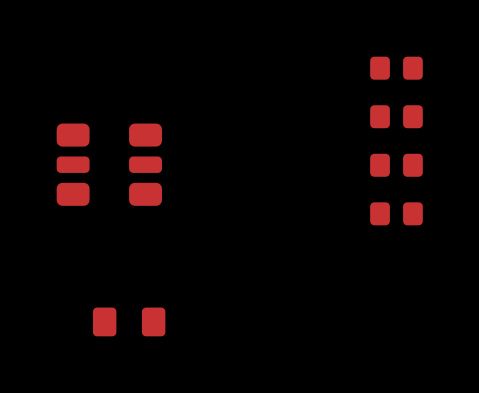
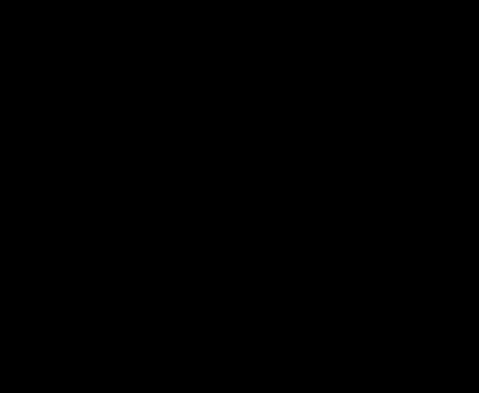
part: (396, 68) -> none
part: (396, 116) -> none
part: (109, 164) -> none
part: (396, 165) -> none
part: (396, 213) -> none
part: (129, 321) -> none

